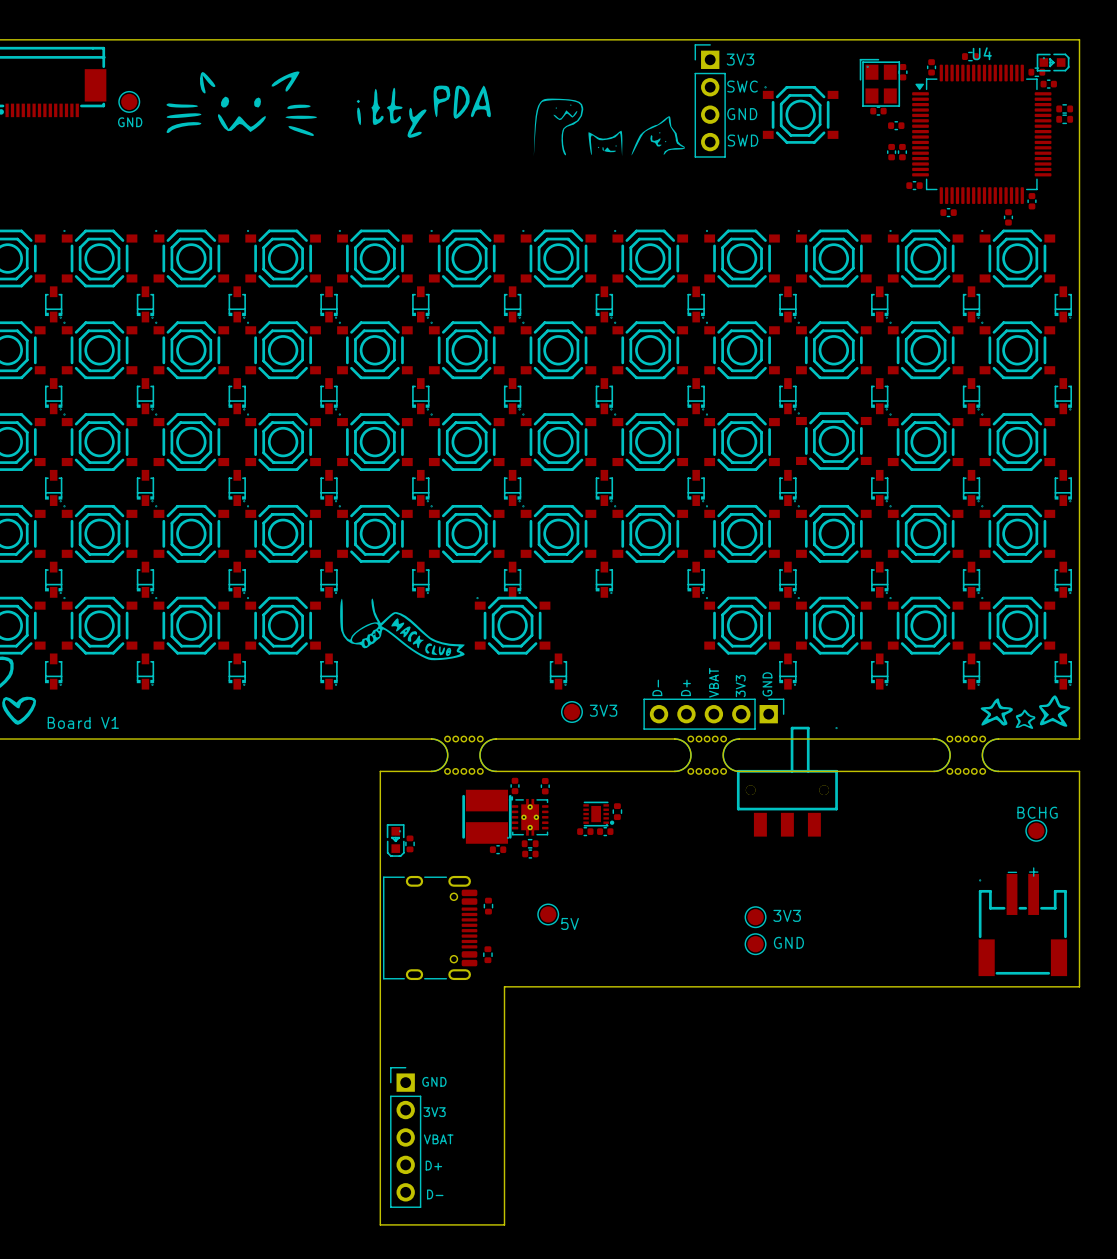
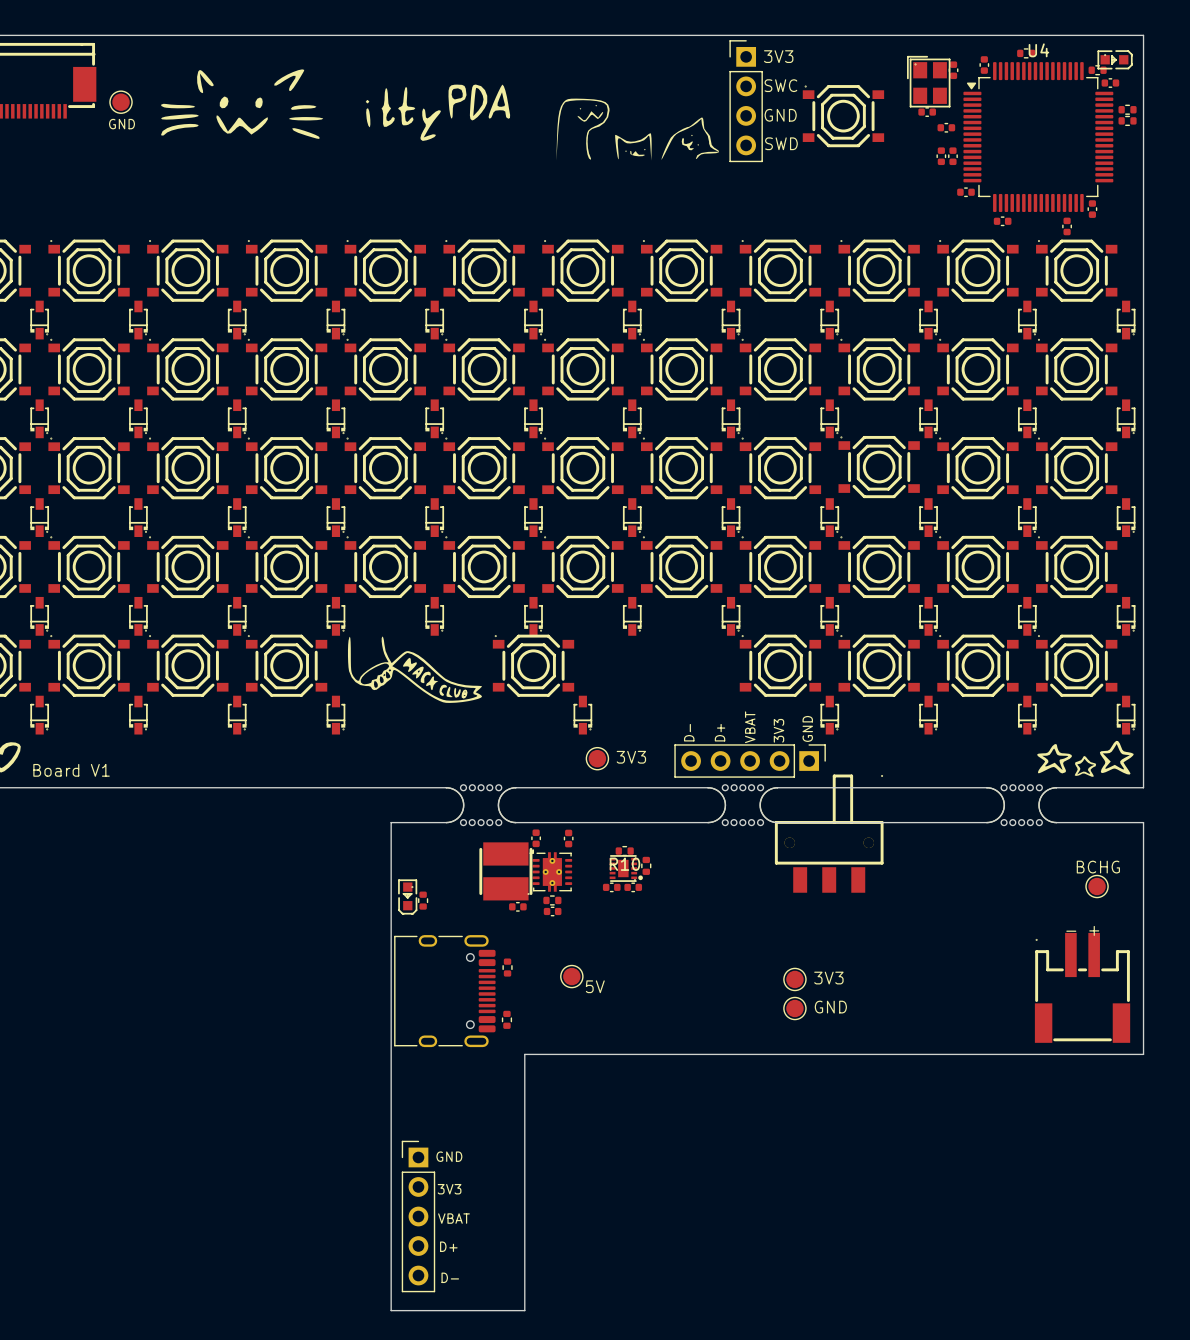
R10: none -> (624, 851)

